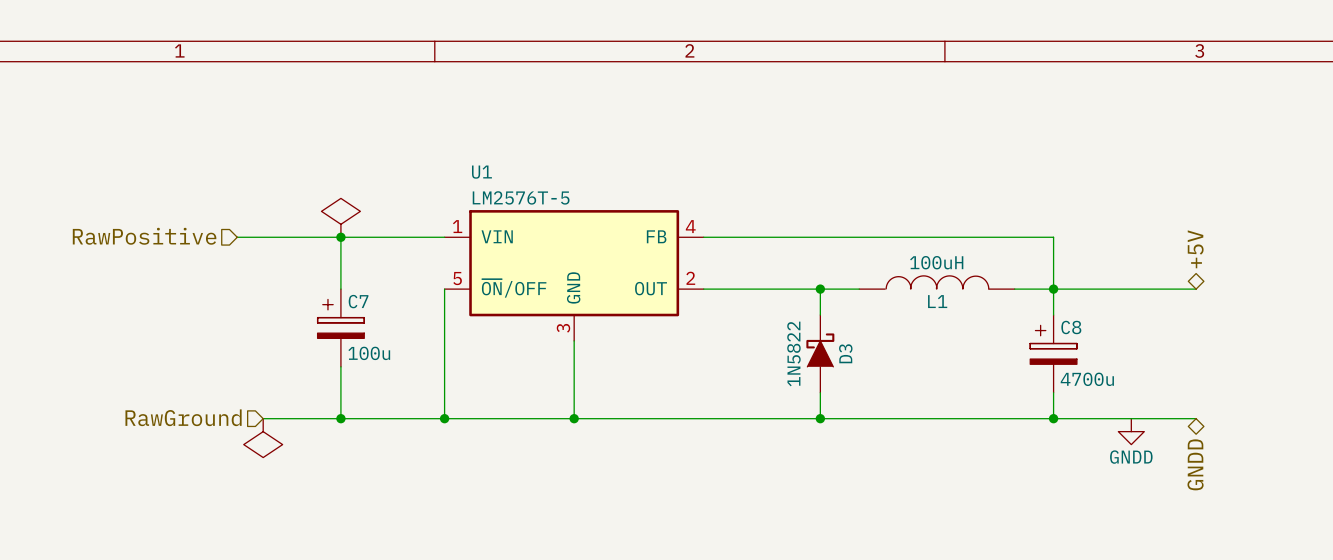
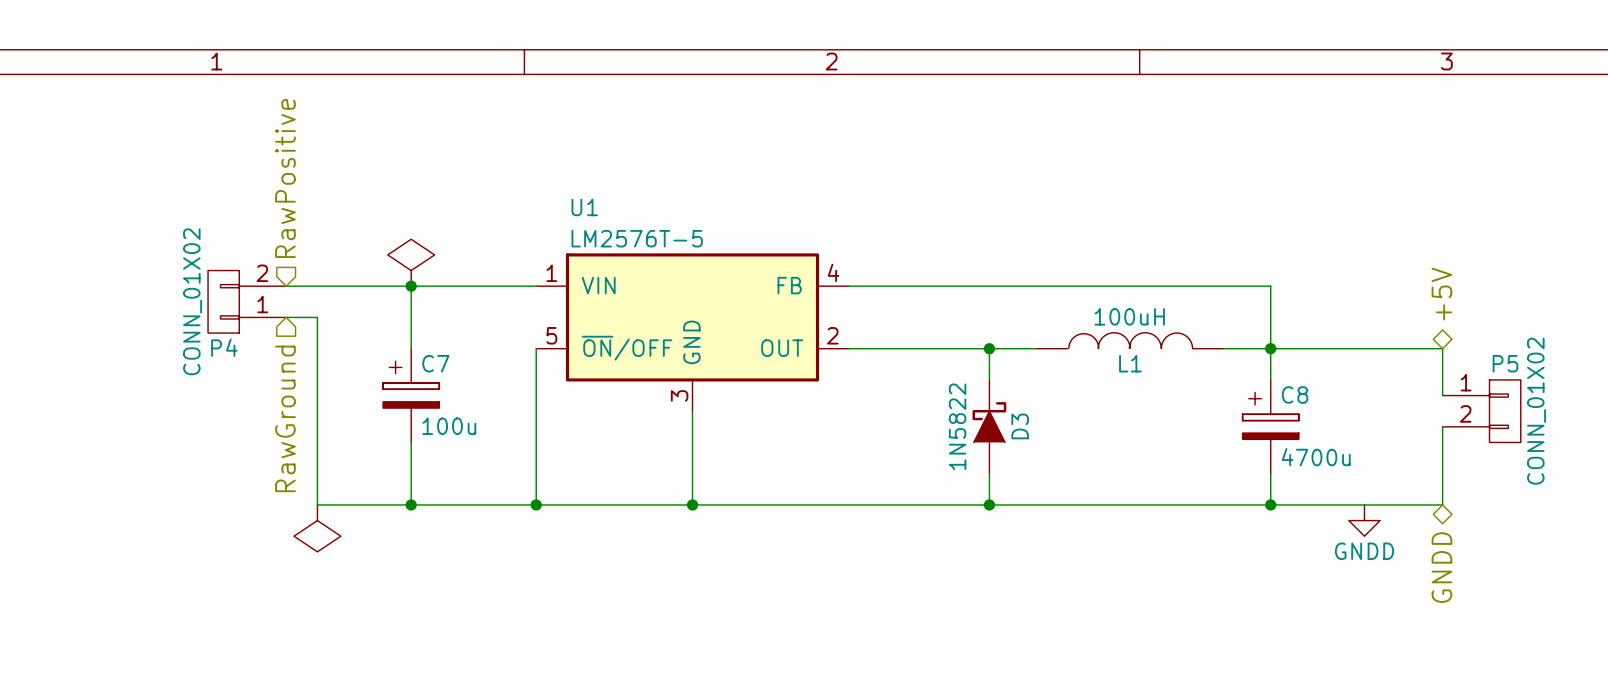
hierarchical label rotation: 0° (144, 236) -> 90° clockwise (285, 178)
P4: none -> CONN_01X02 (247, 301)
wire: none -> (286, 317) (317, 317) (317, 504)
wire: none -> (1442, 348) (1442, 395)
P5: none -> CONN_01X02 (1481, 411)
wire: none -> (1442, 426) (1442, 504)
hierarchical label rotation: 0° (183, 417) -> 90° counterclockwise (285, 418)

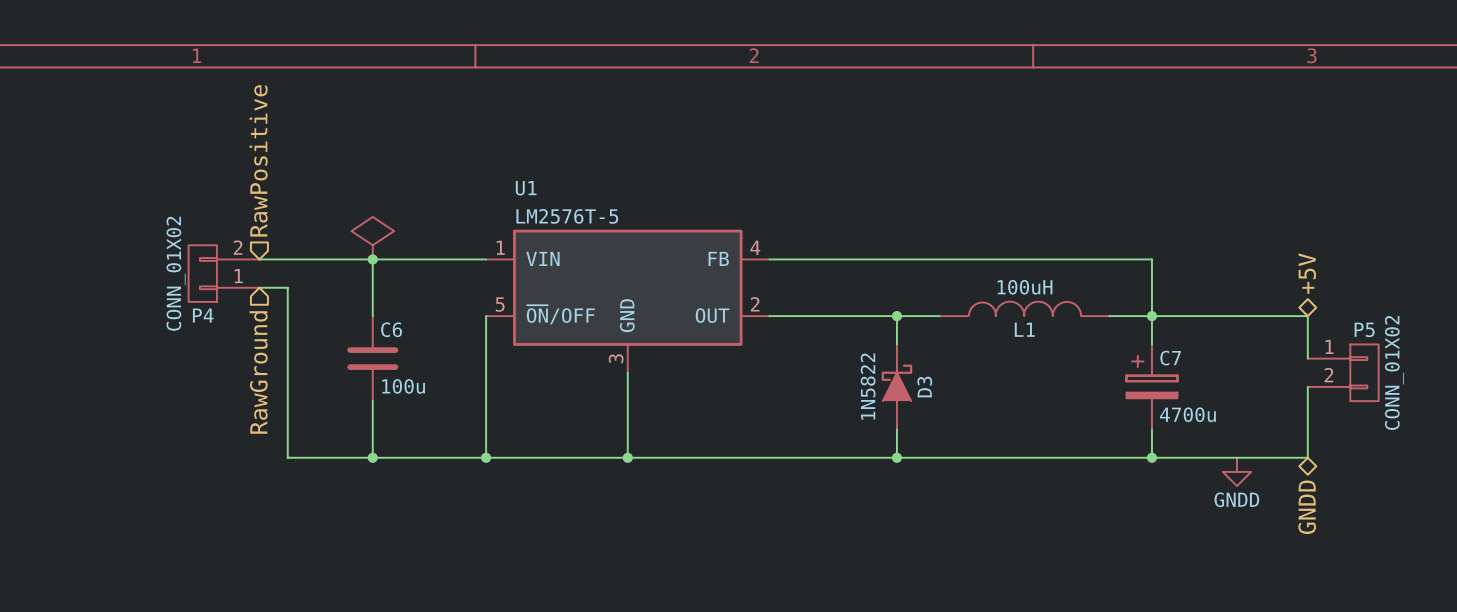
C8 name: C8 (1295, 394) -> C7 (1170, 358)
C7: 100u (411, 395) -> none
C6: none -> 100u (372, 358)
power symbol: (317, 528) -> none

